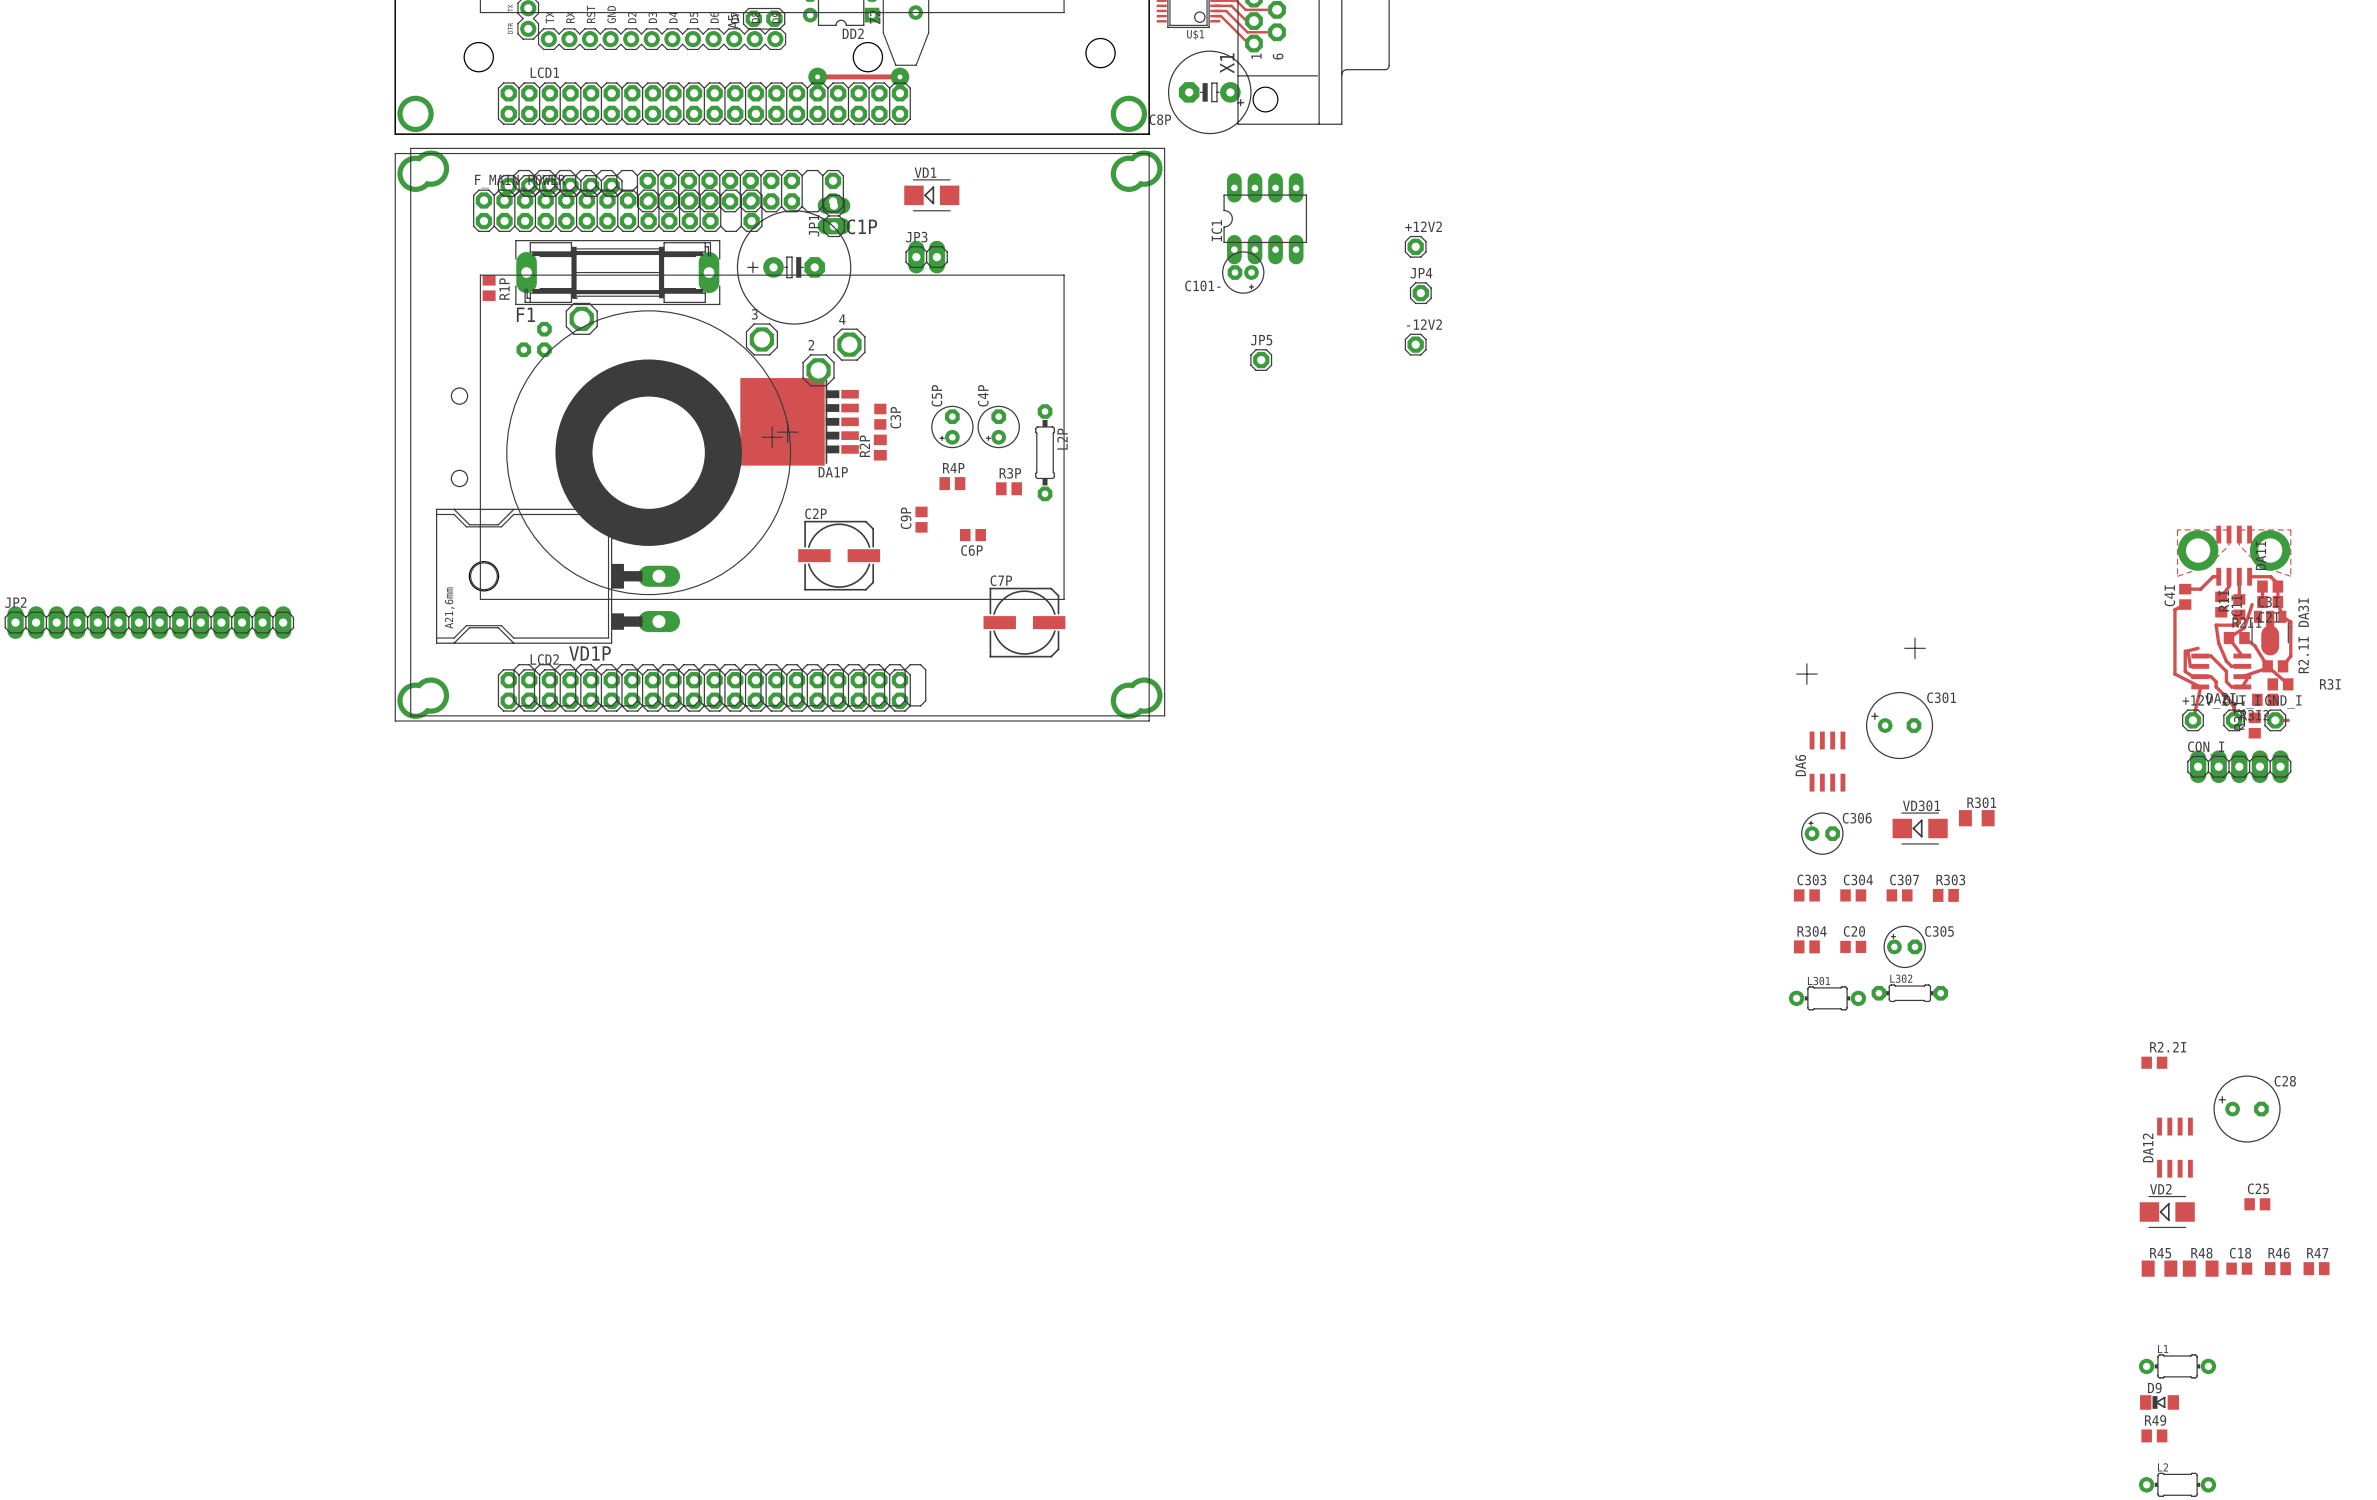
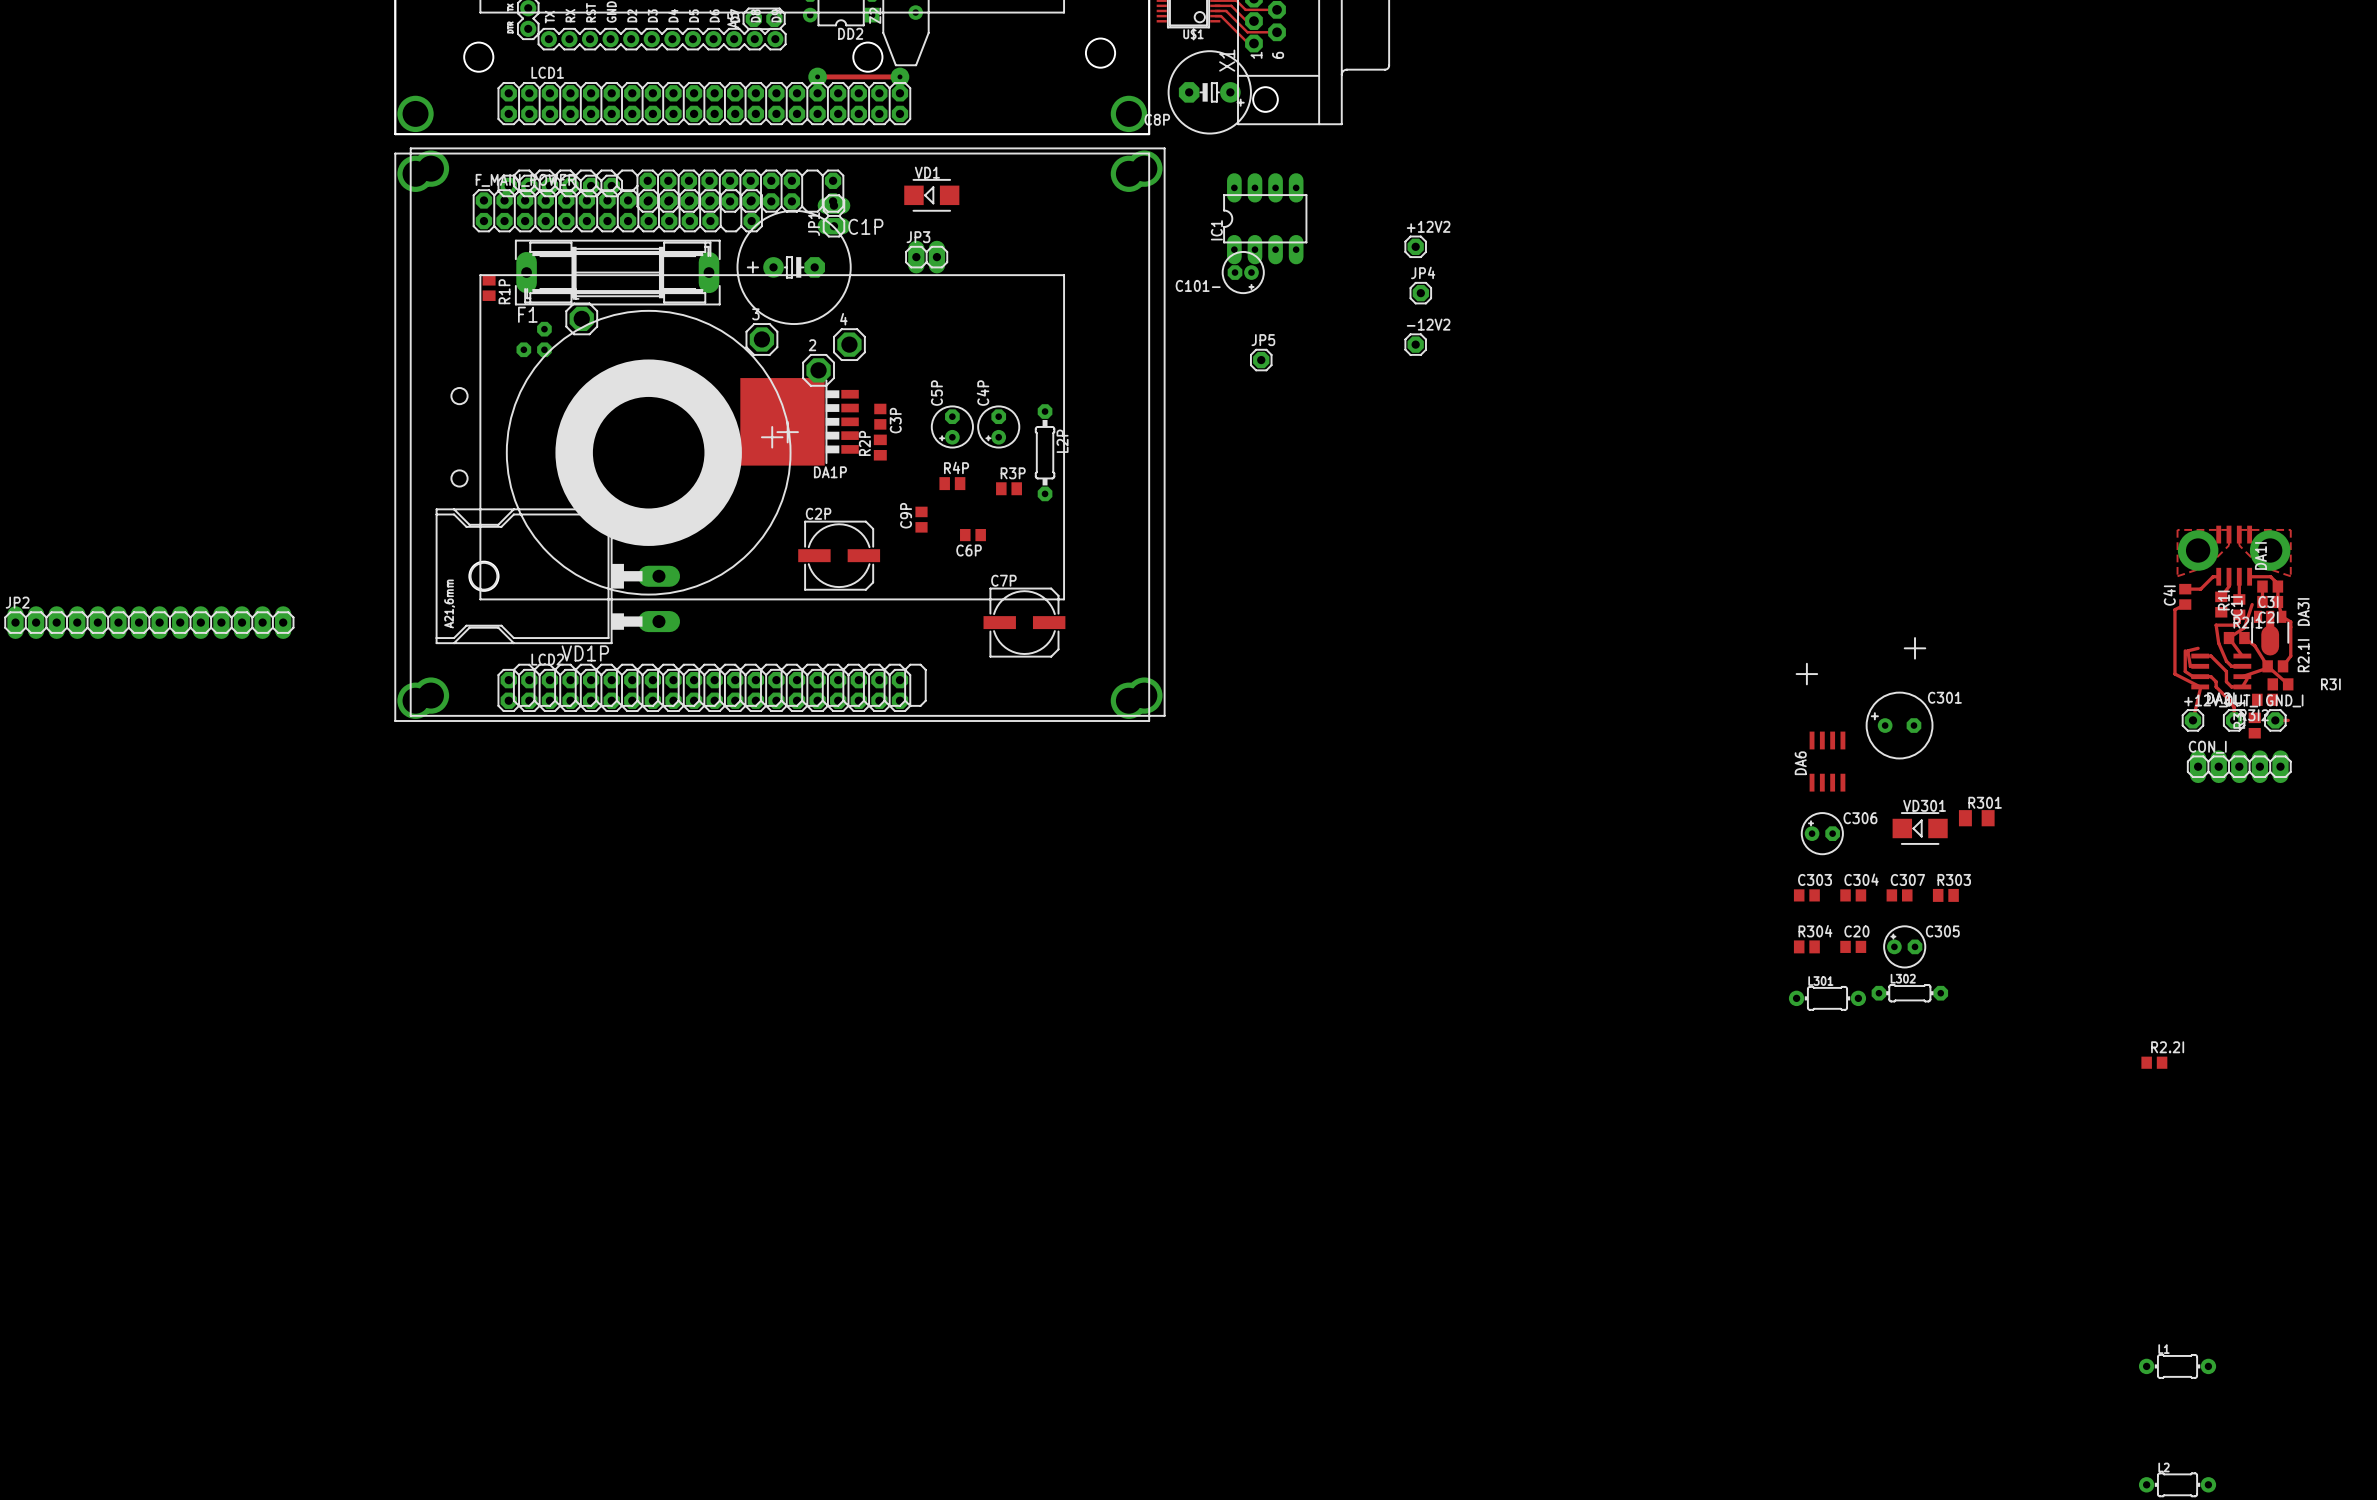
C28: (2247, 1109) -> none
DA12: (2174, 1147) -> none
C25: (2257, 1204) -> none
VD2: (2167, 1211) -> none
R45: (2159, 1268) -> none
R48: (2200, 1268) -> none
C18: (2239, 1268) -> none
R46: (2277, 1268) -> none
R47: (2316, 1268) -> none
D9: (2159, 1402) -> none
R49: (2154, 1435) -> none

